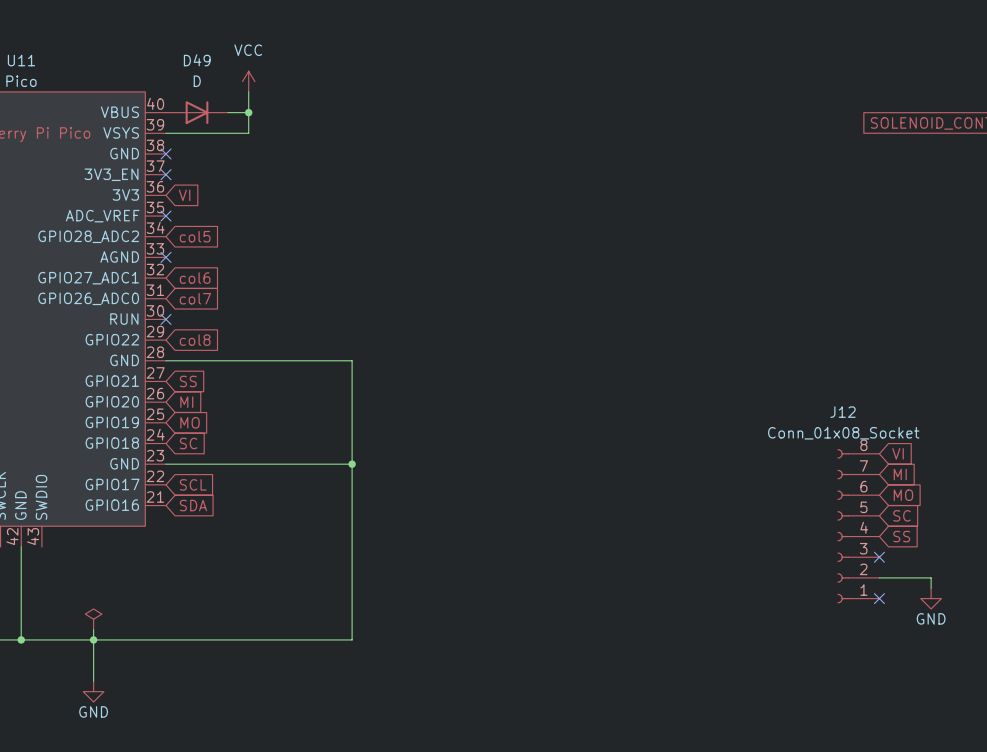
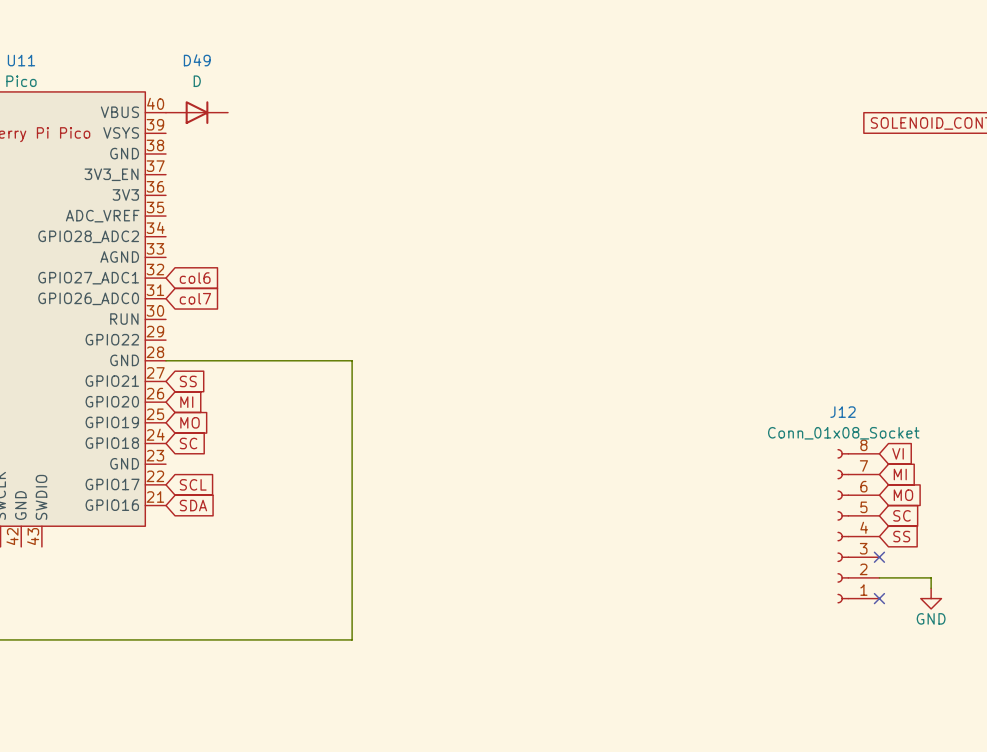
power symbol: VCC (248, 81) -> none
wire: (248, 91) (248, 133) (165, 133) -> none
wire: (228, 112) (248, 112) -> none
junction: (248, 112) -> none
no-connect mark: (165, 153) -> none
no-connect mark: (165, 174) -> none
global label: VI (184, 195) -> none
no-connect mark: (165, 216) -> none
global label: col5 (195, 236) -> none
no-connect mark: (165, 257) -> none
no-connect mark: (165, 319) -> none
global label: col8 (195, 340) -> none
wire: (165, 464) (352, 464) -> none
junction: (352, 464) -> none
wire: (21, 546) (21, 639) -> none
power symbol: (93, 619) -> none
wire: (93, 629) (93, 681) -> none
junction: (21, 639) -> none
junction: (93, 639) -> none
power symbol: GND (93, 691) -> none

